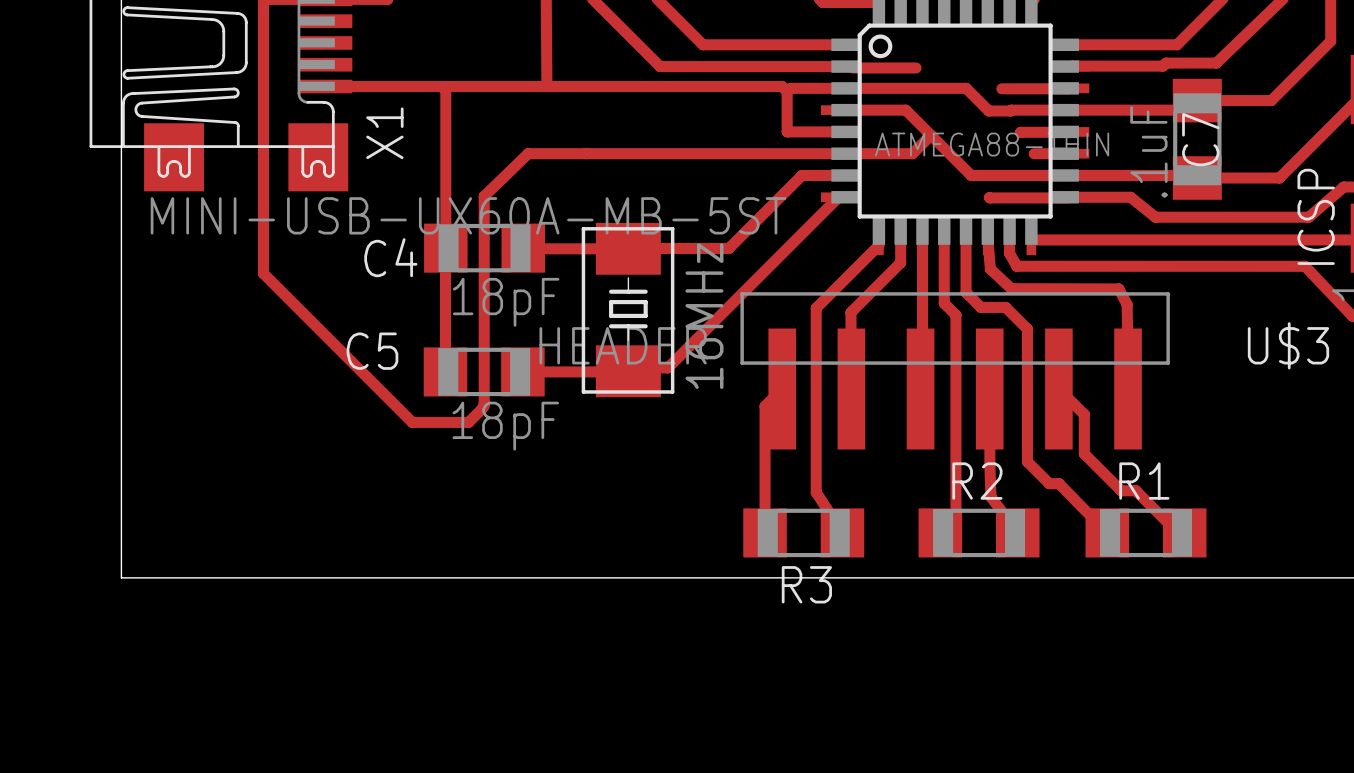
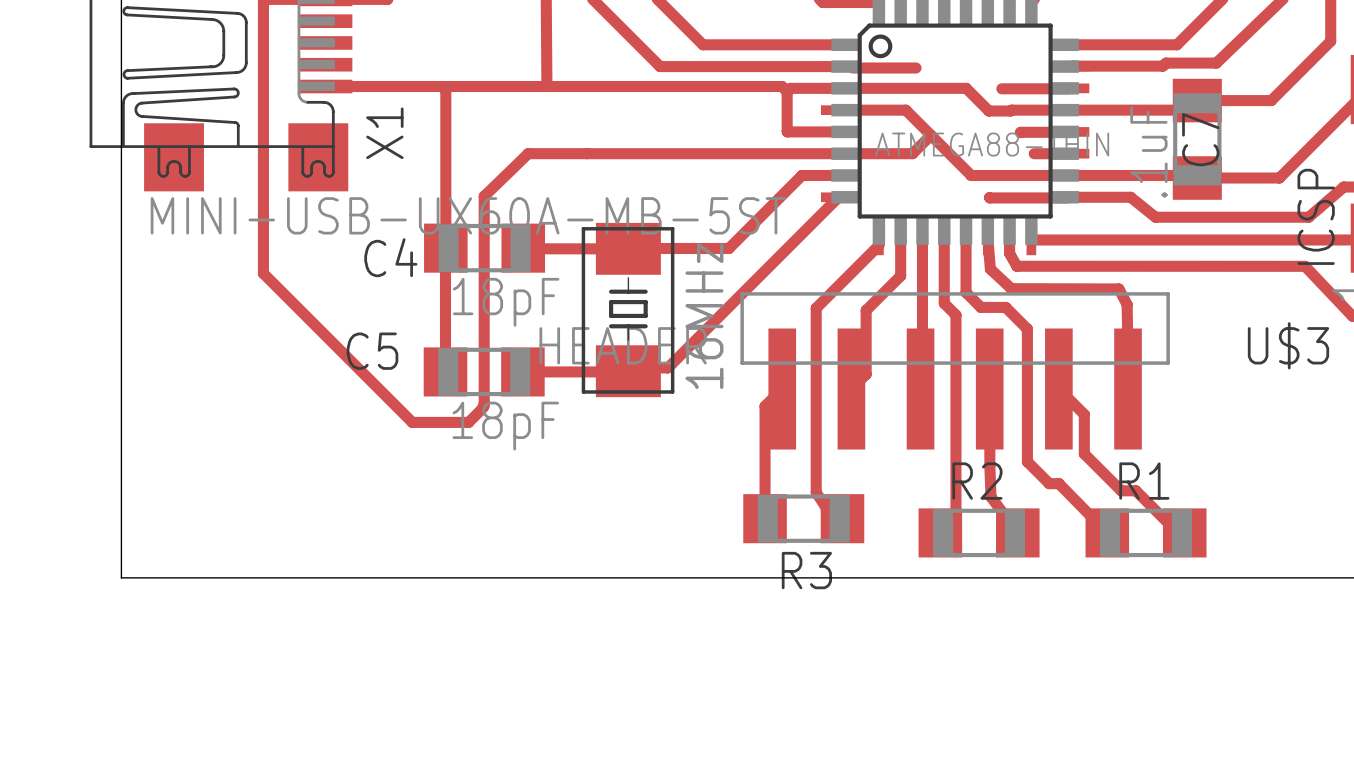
top track: (900, 262) (850, 312) (851, 389) -> (900, 262) (900, 275) (866, 310) (866, 374) (851, 389)
R3 position: (803, 532) -> (803, 518)

